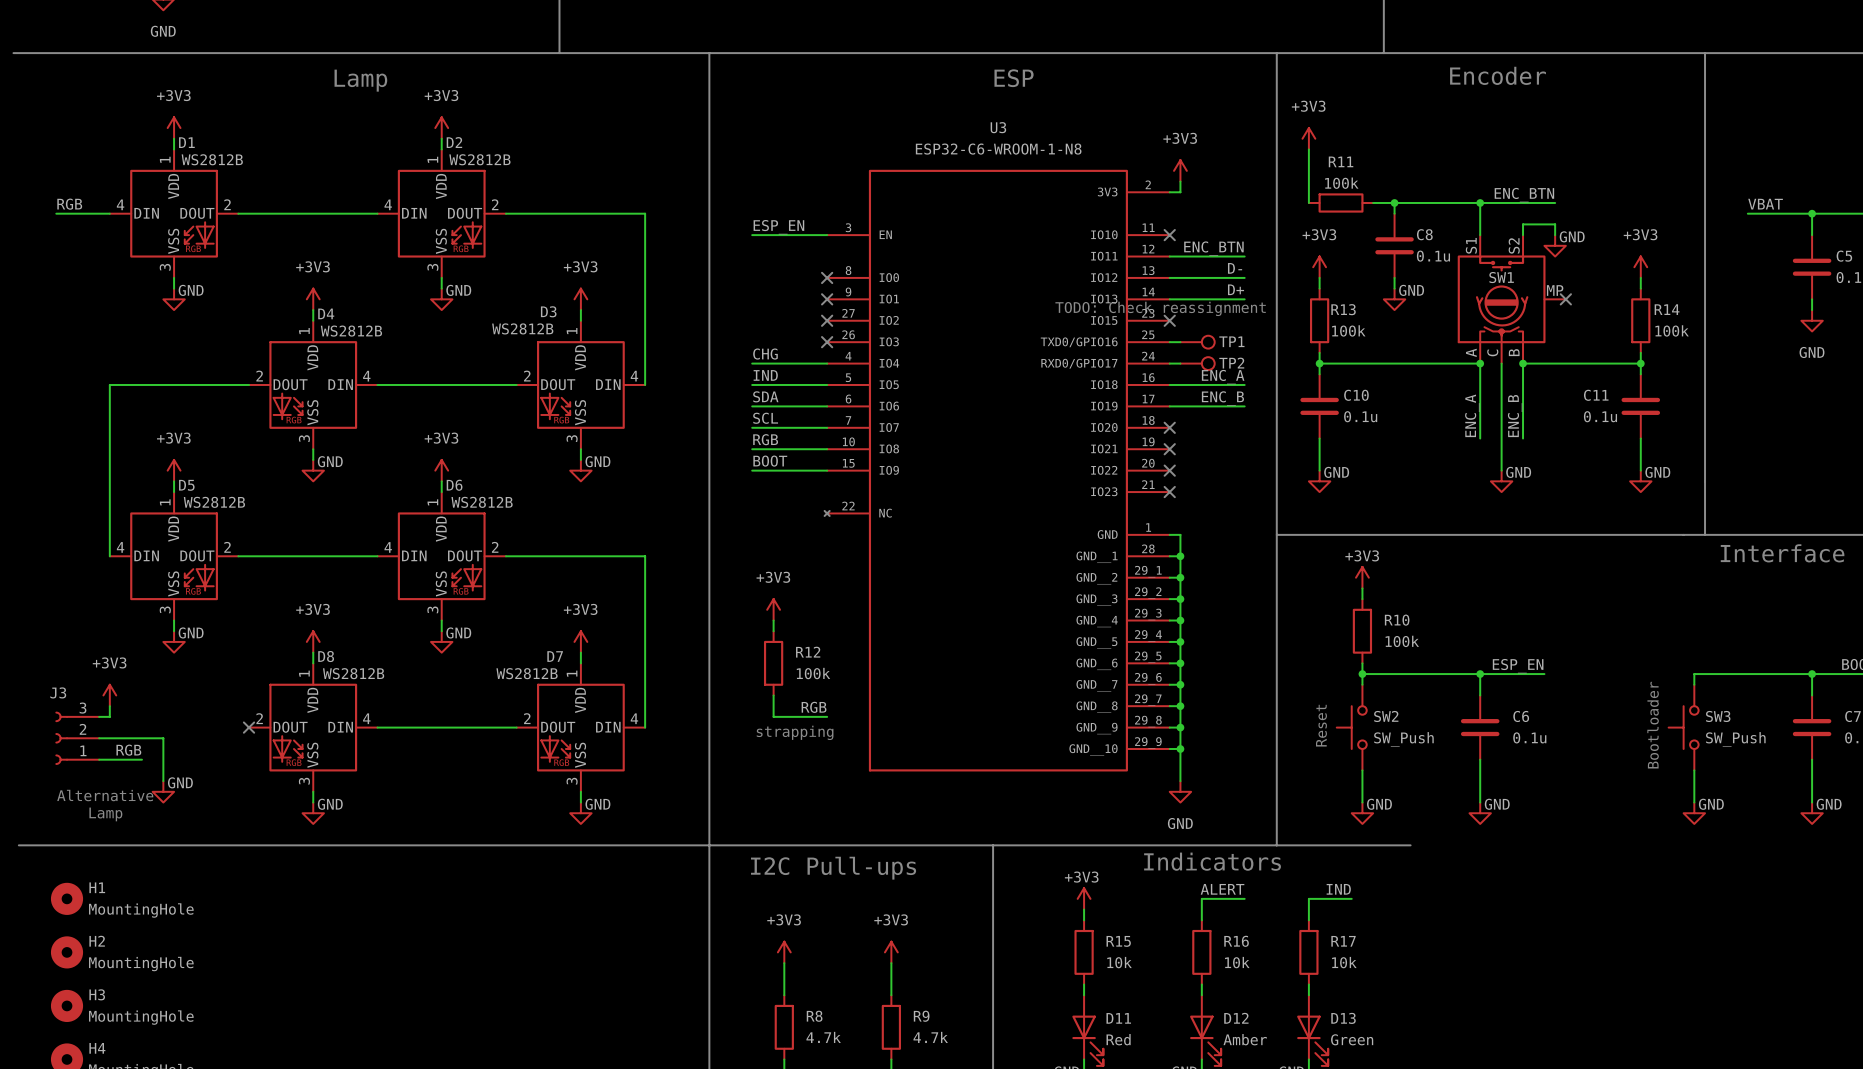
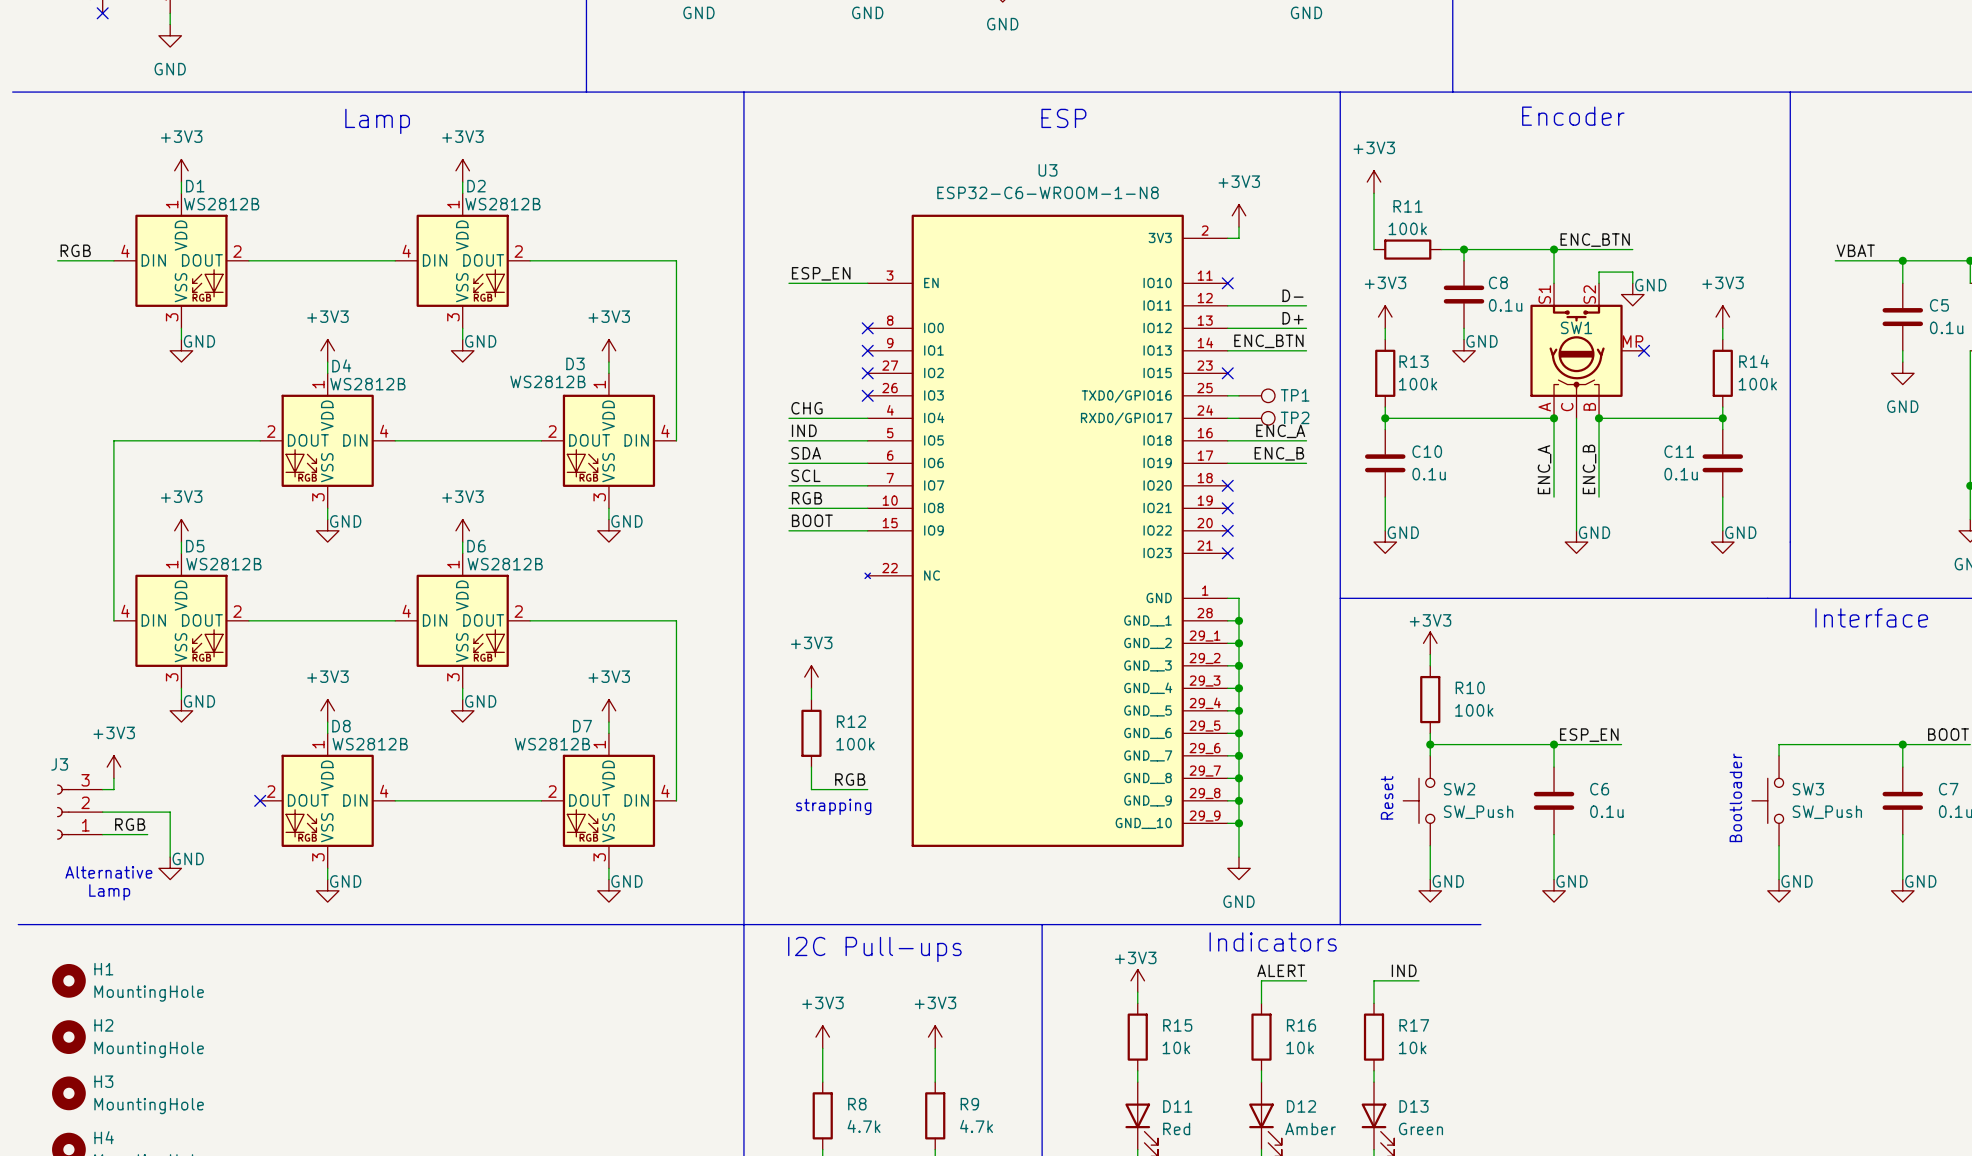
label: ENC_BTN (1213, 248) -> D- (1293, 295)
label: D- (1235, 268) -> D+ (1293, 318)
label: D+ (1236, 289) -> ENC_BTN (1268, 341)
text: TODO: Check reassignment (1160, 308) -> none

